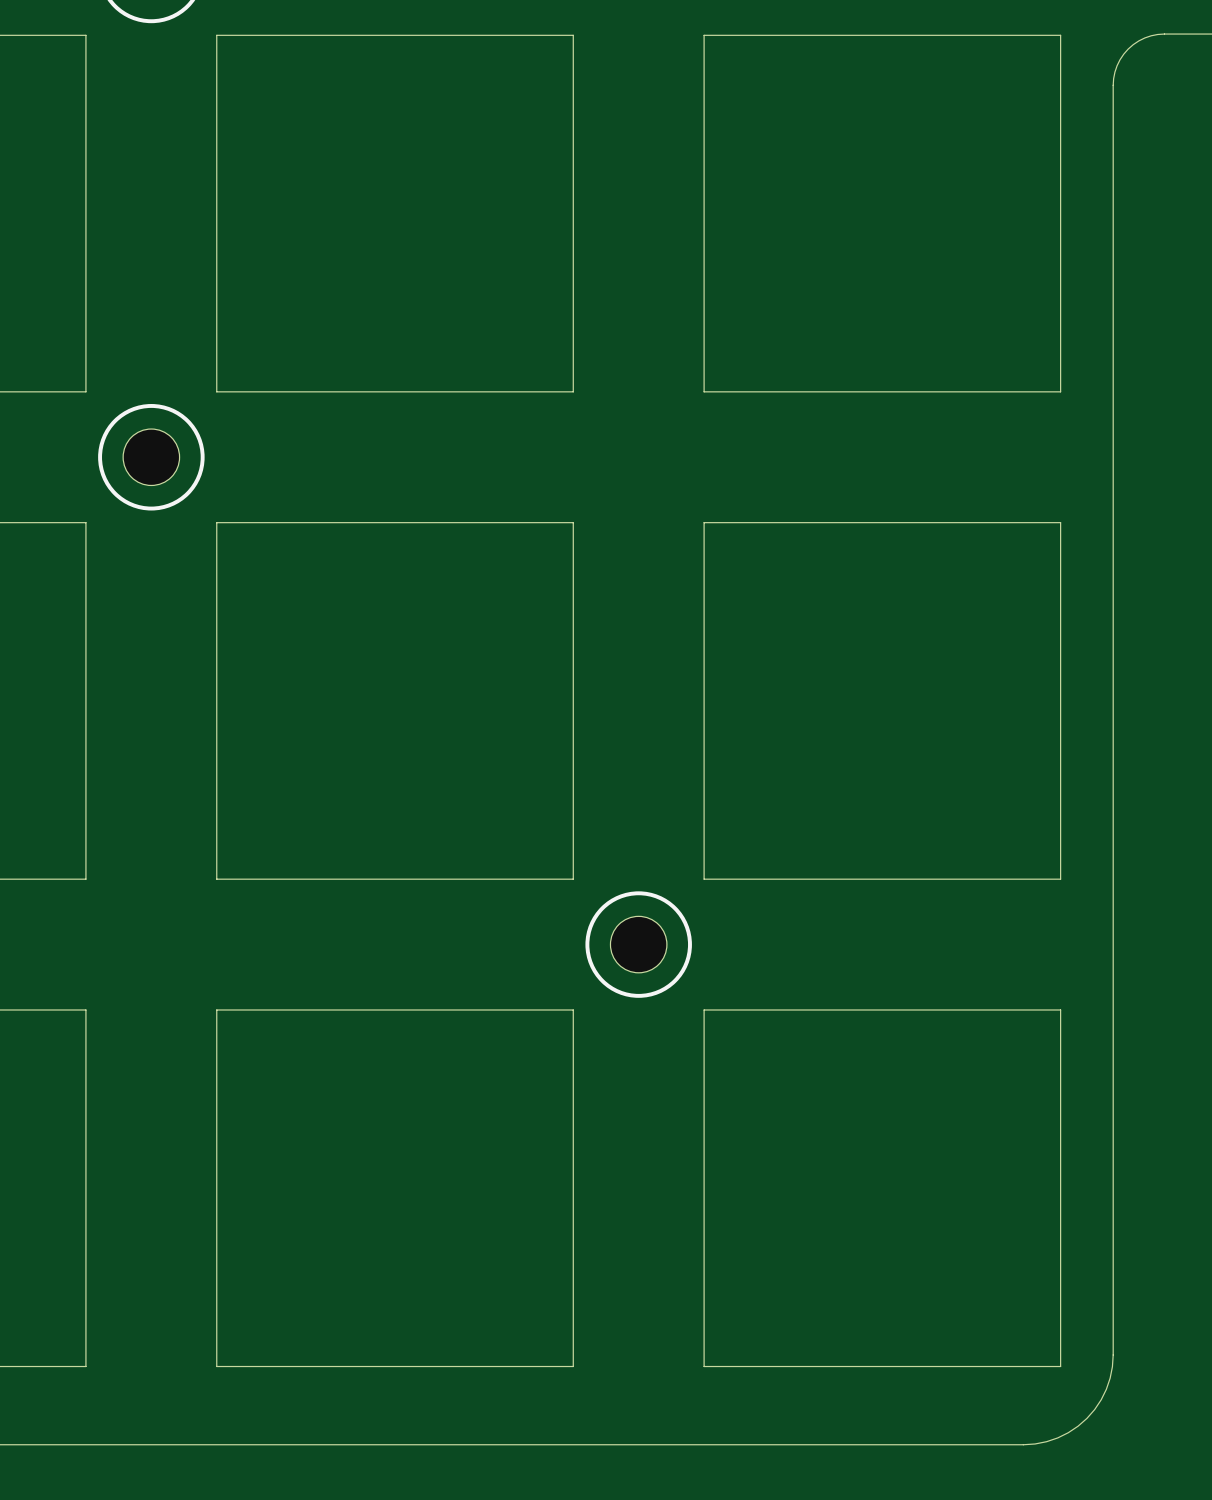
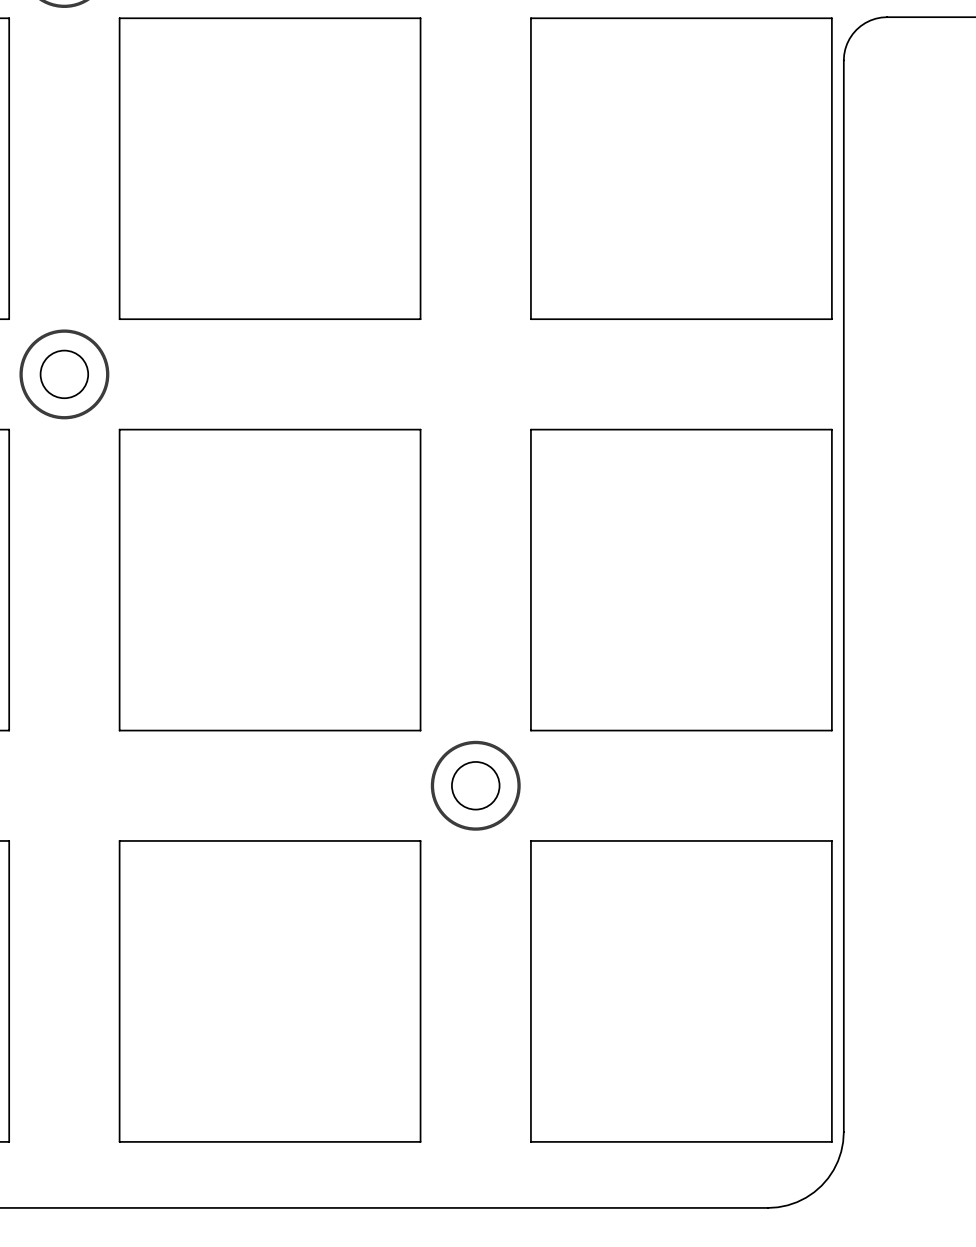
board edge: (1164, 34) (1144, 37) (1128, 49) (1117, 65) (1113, 85) (1112, 1366) (1106, 1389) (1101, 1399) (1086, 1418) (1068, 1432) (1057, 1437) (1035, 1443) (984, 1444) -> (919, 17) (881, 17) (865, 22) (849, 38) (844, 54) (843, 1142) (838, 1161) (821, 1185) (797, 1202) (768, 1207)

